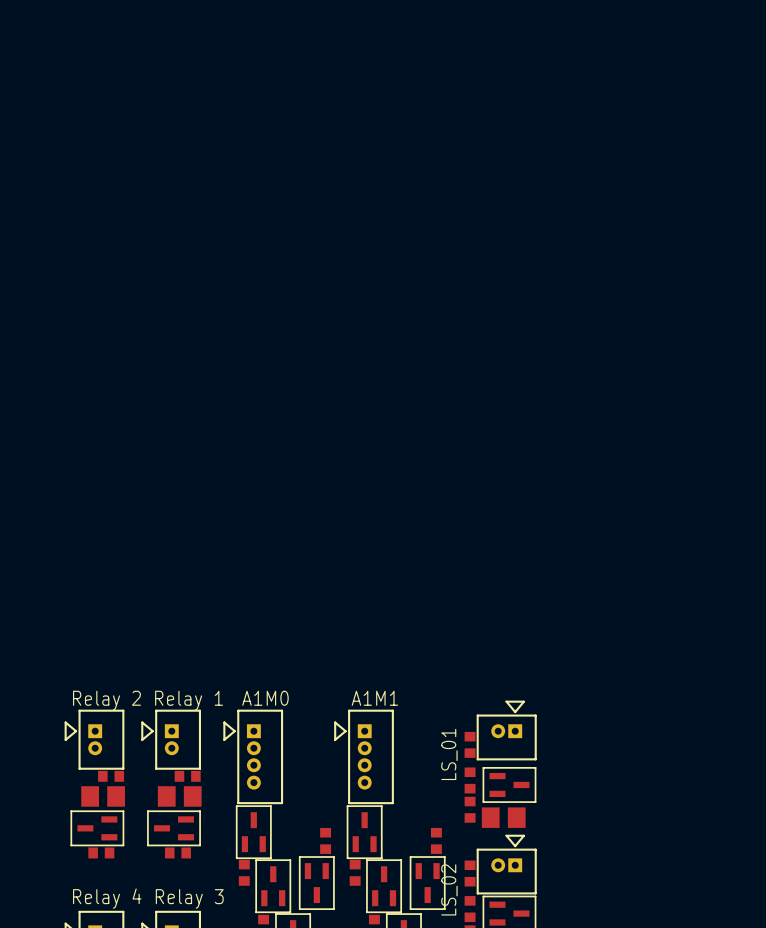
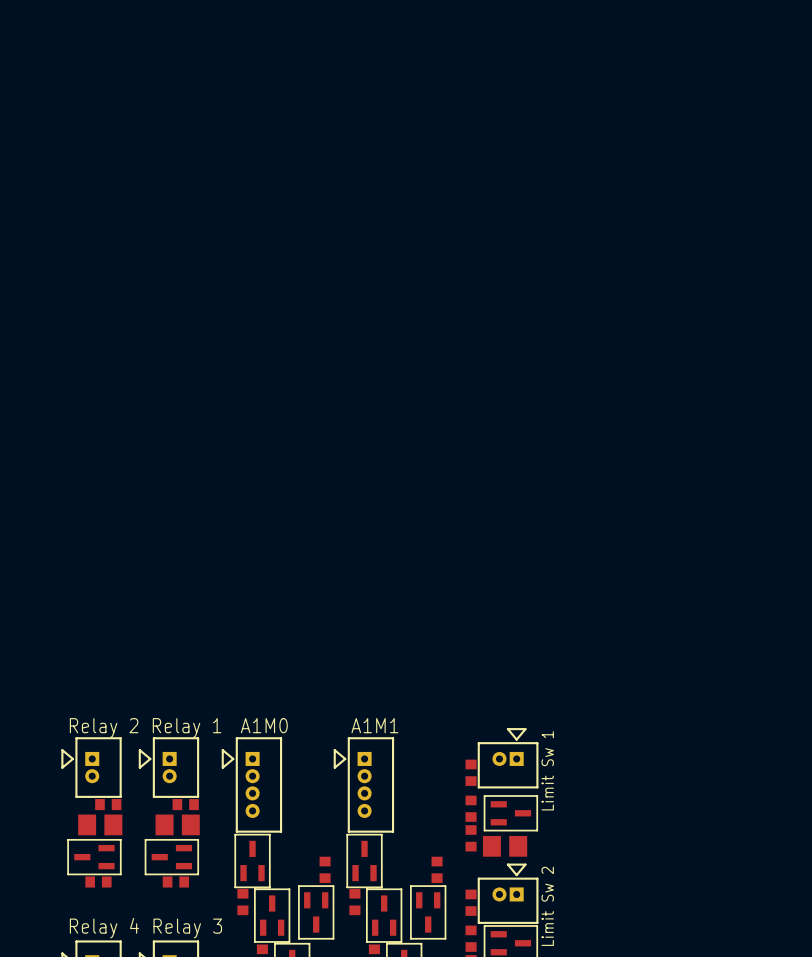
text: none -> Limit Sw 1 (547, 770)
text: LS_01 (449, 754) -> none
text: none -> Limit Sw 2 (547, 906)
text: LS_02 (449, 889) -> none

